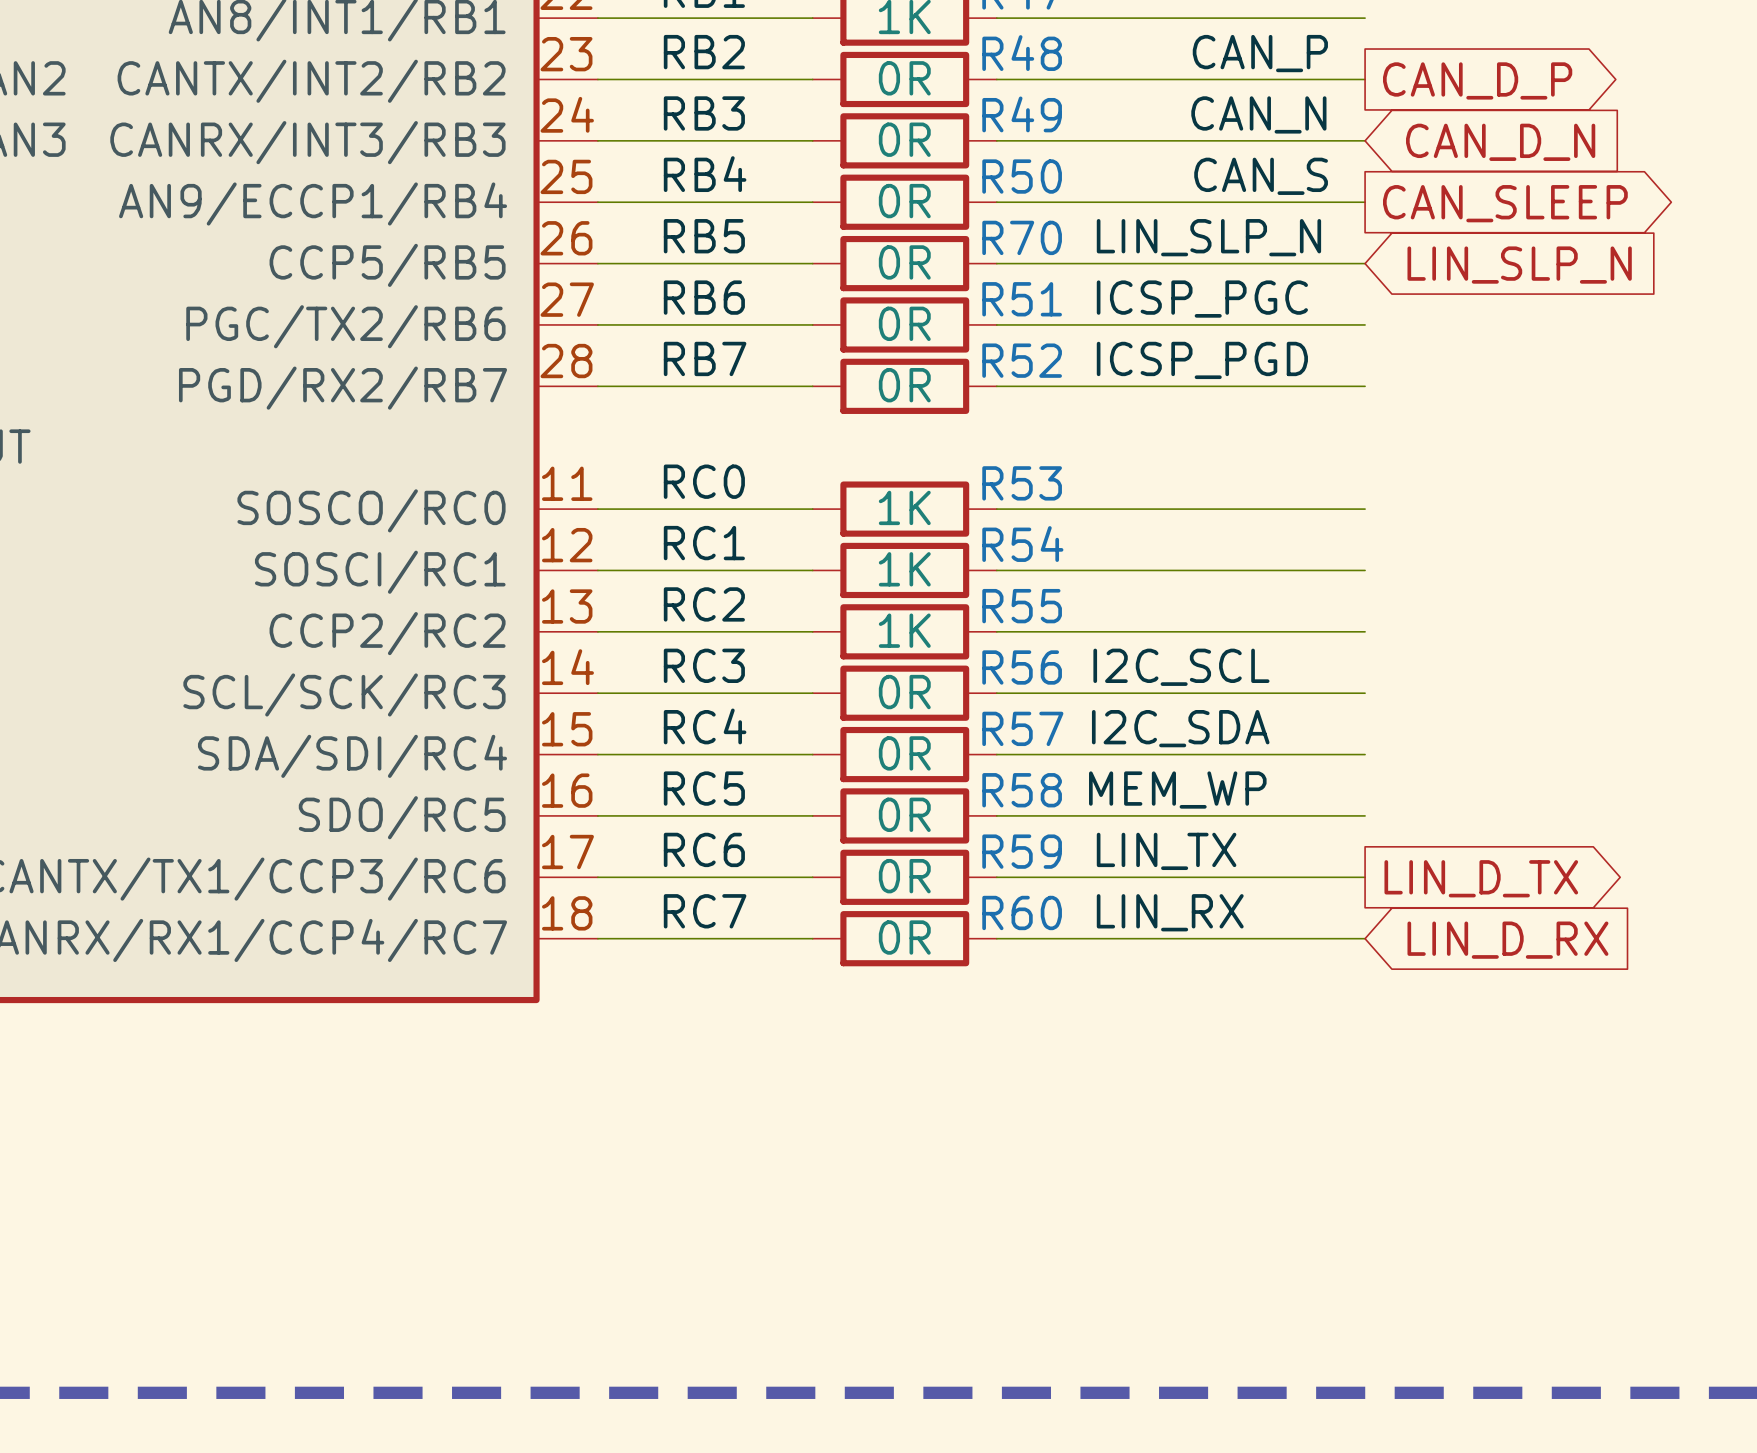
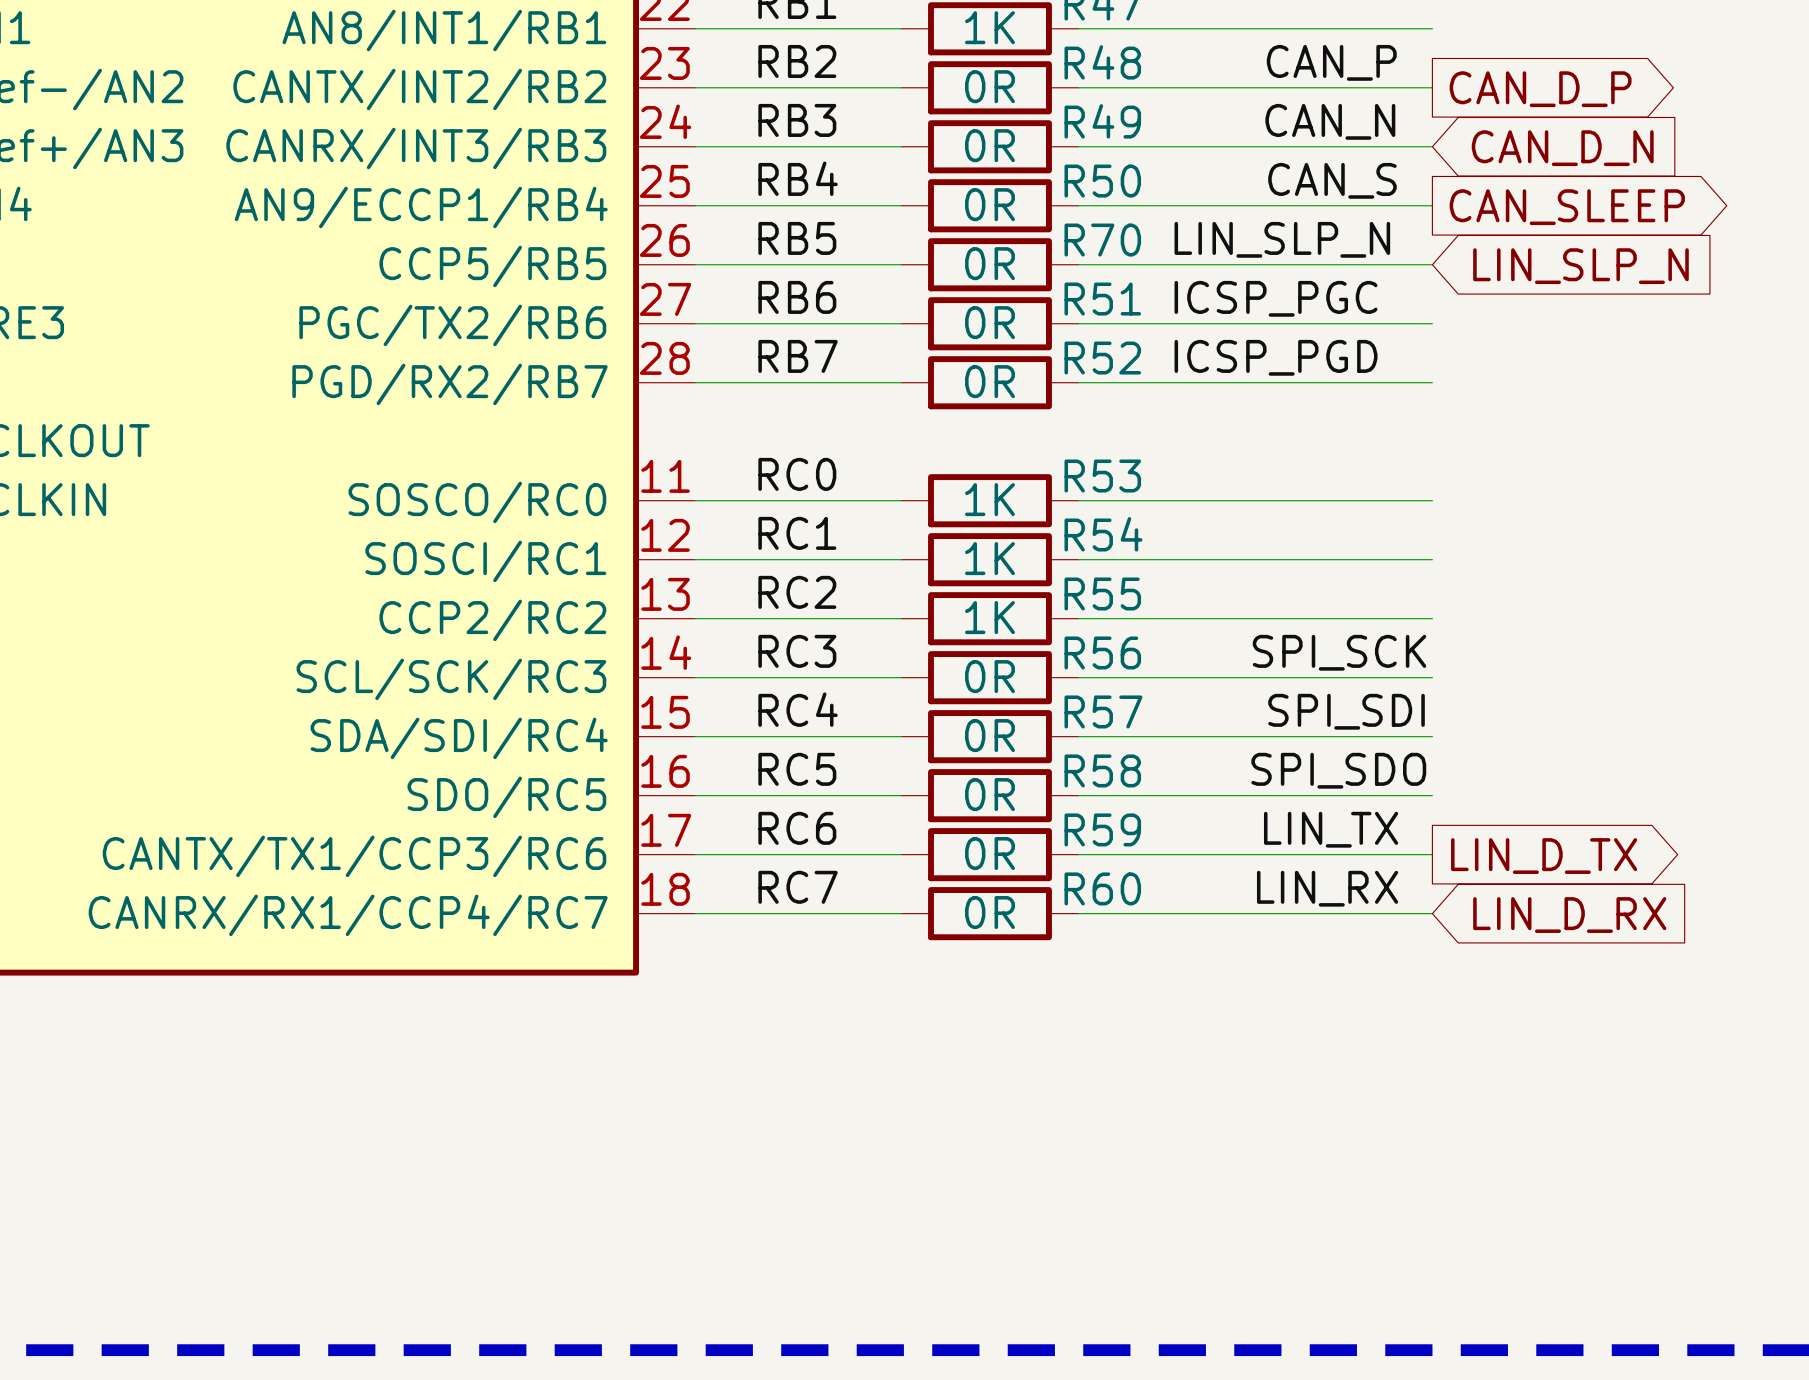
label: I2C_SCL (1181, 667) -> none
label: none -> SPI_SCK (1339, 652)
label: I2C_SDA (1180, 728) -> none
label: none -> SPI_SDI (1346, 711)
label: MEM_WP (1177, 790) -> none
label: none -> SPI_SDO (1338, 770)
label position: LIN_TX (1166, 851) -> LIN_TX (1331, 829)
label position: LIN_RX (1170, 912) -> LIN_RX (1327, 888)

